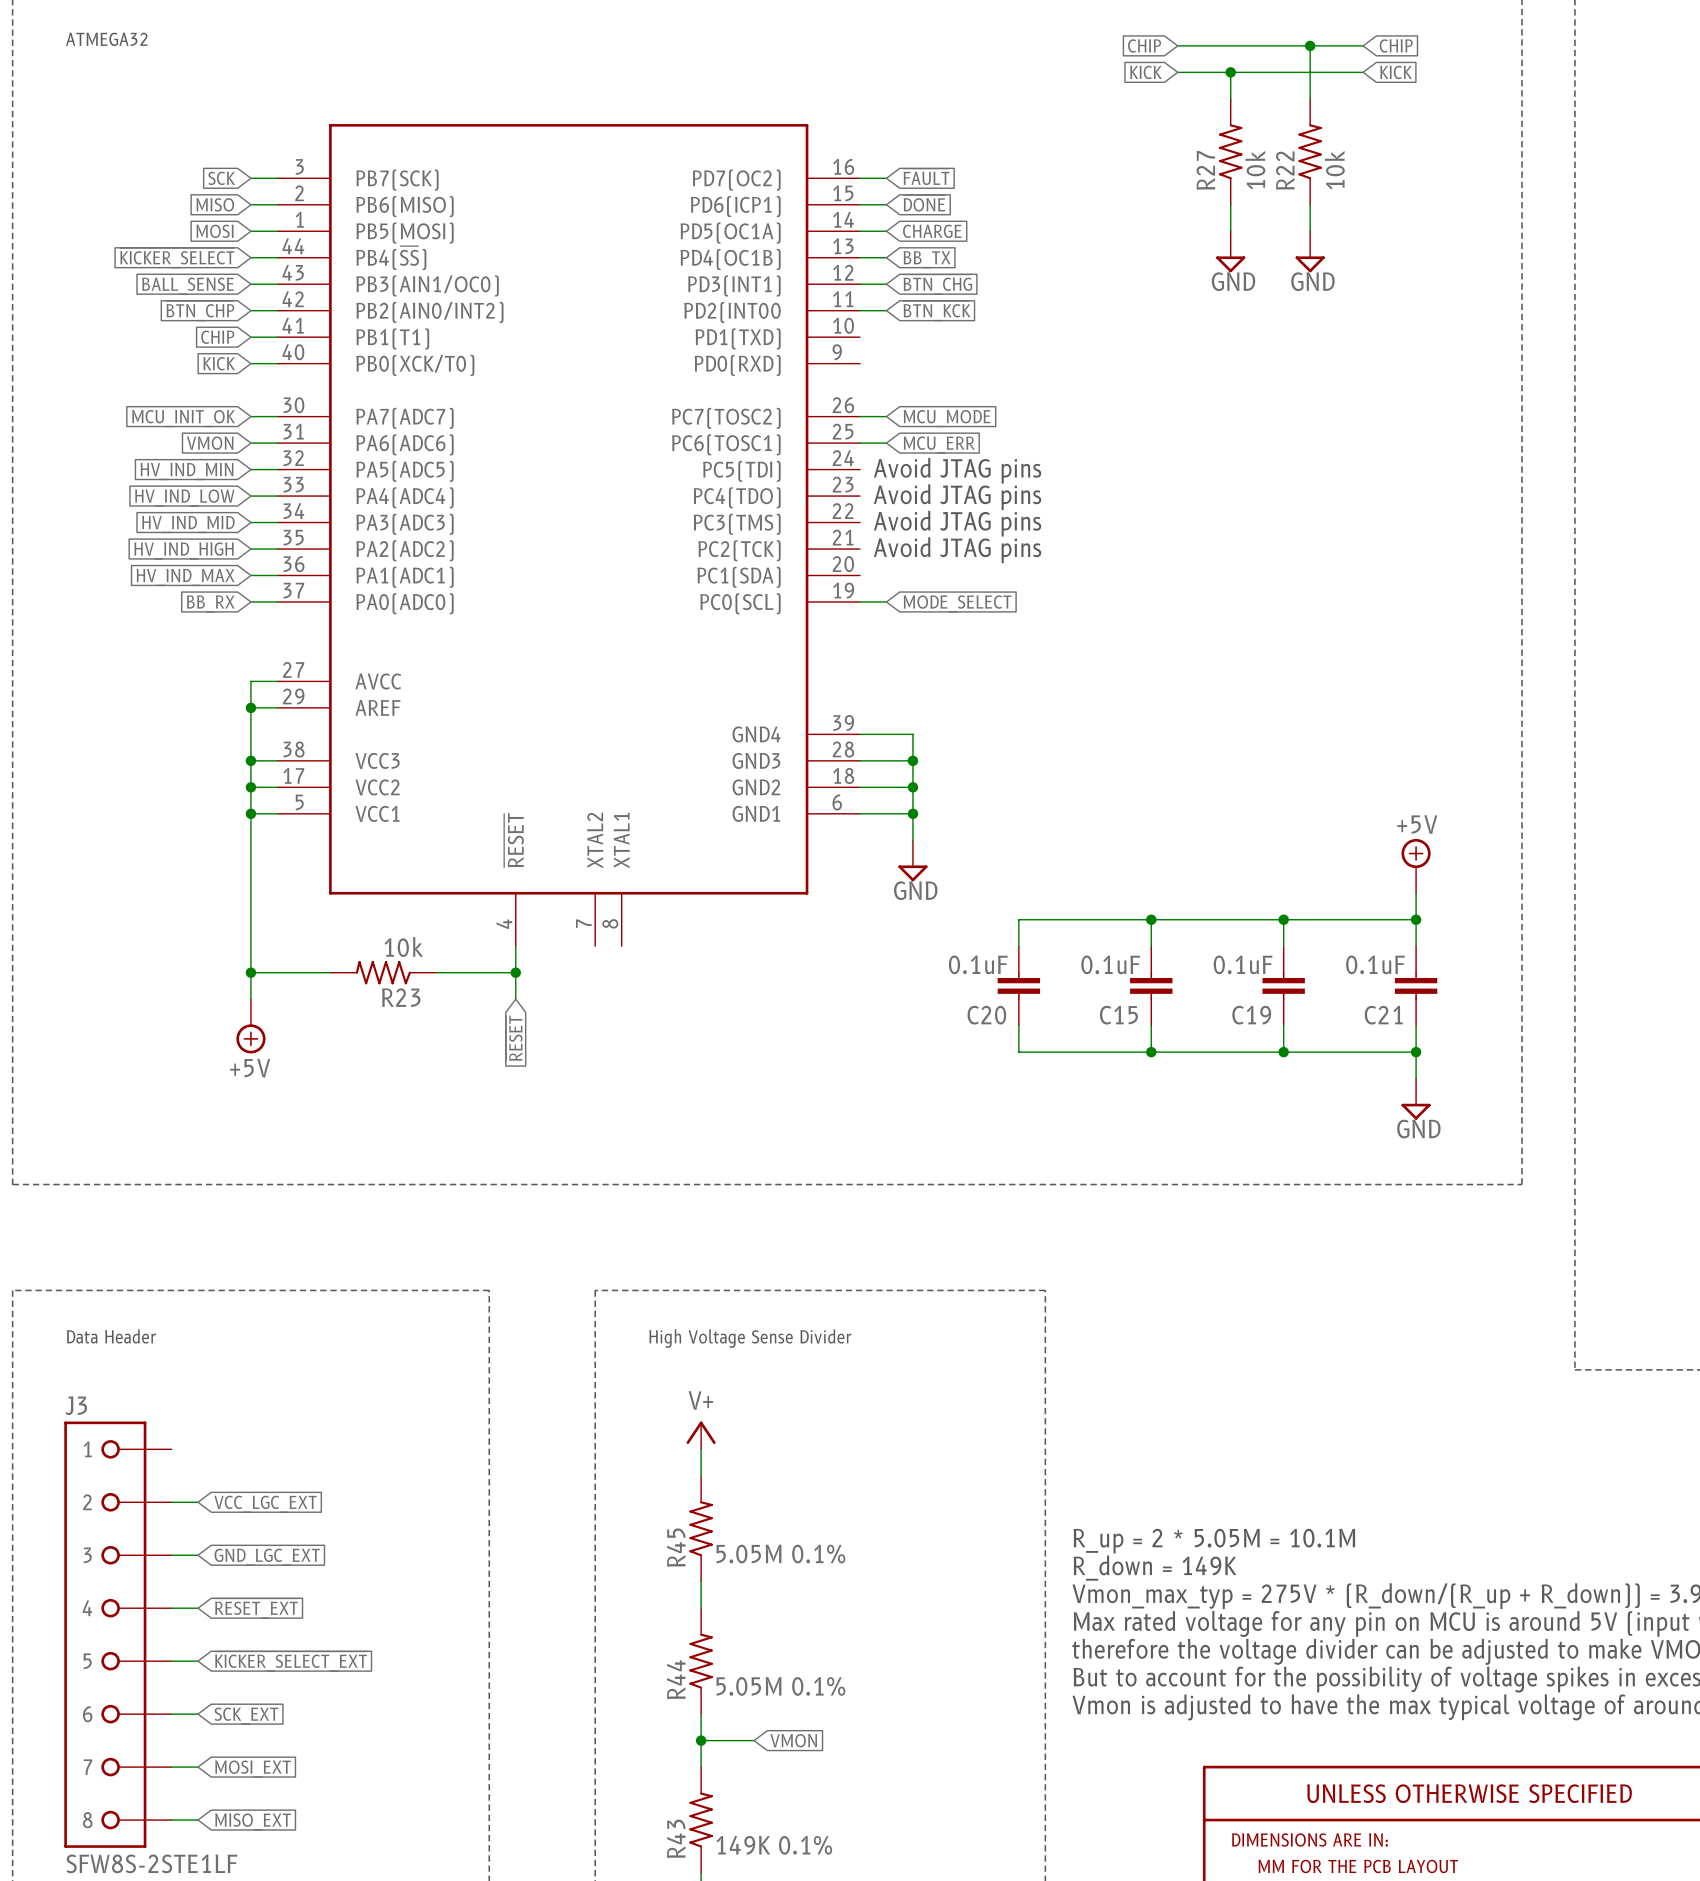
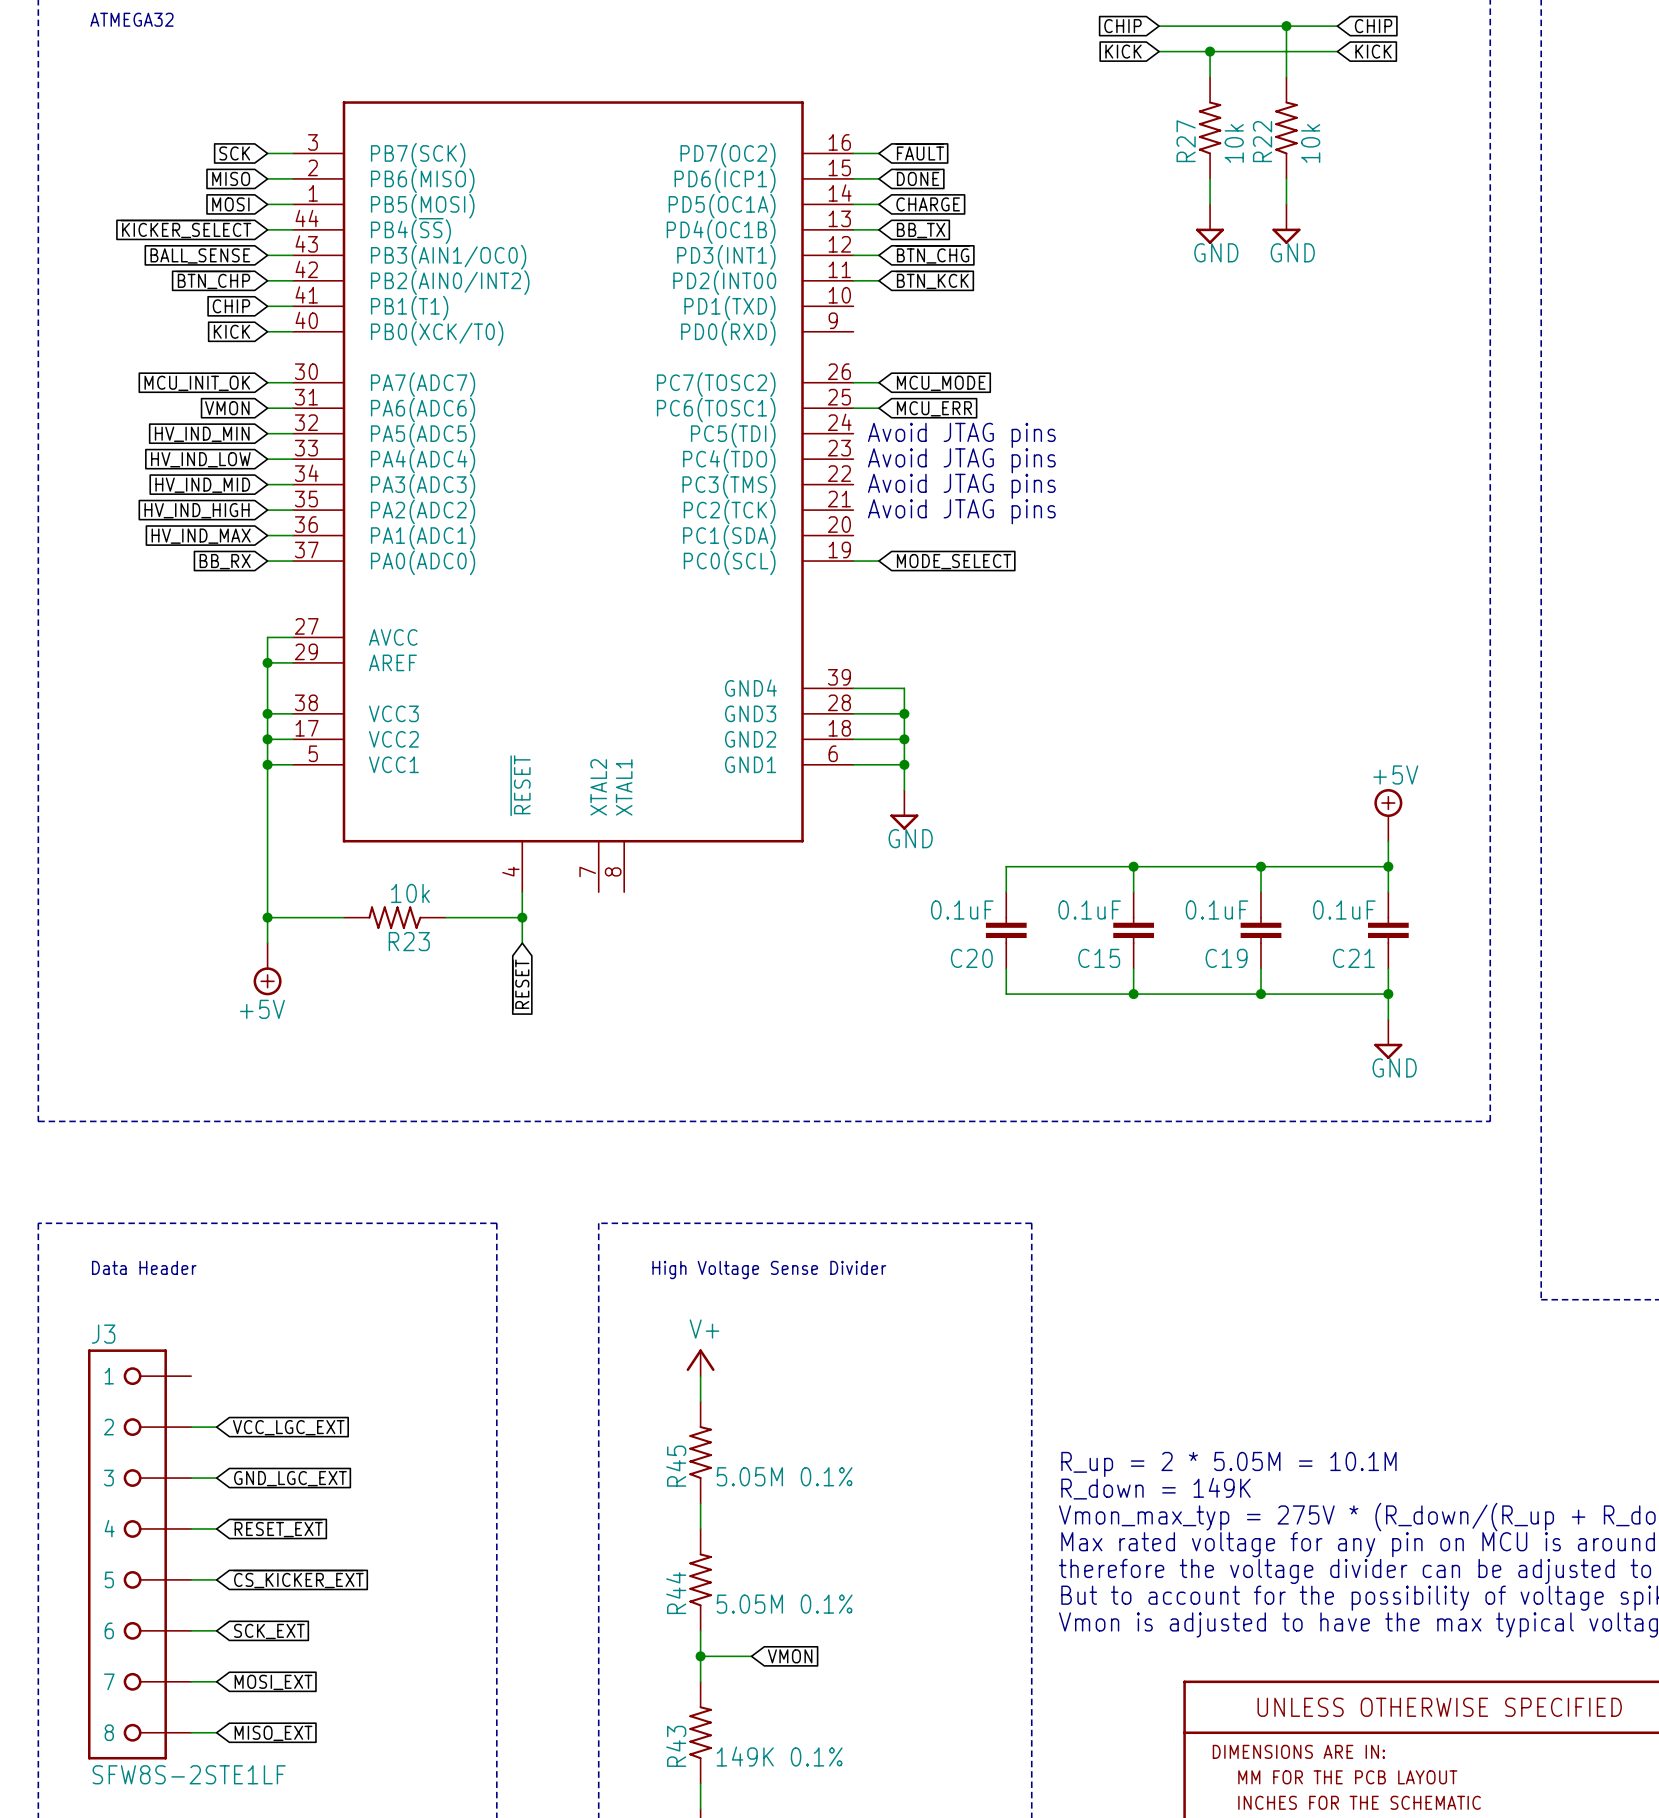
global label: ~{KICKER_SELECT_EXT} (290, 1661) -> ~{CS_KICKER_EXT} (298, 1579)

